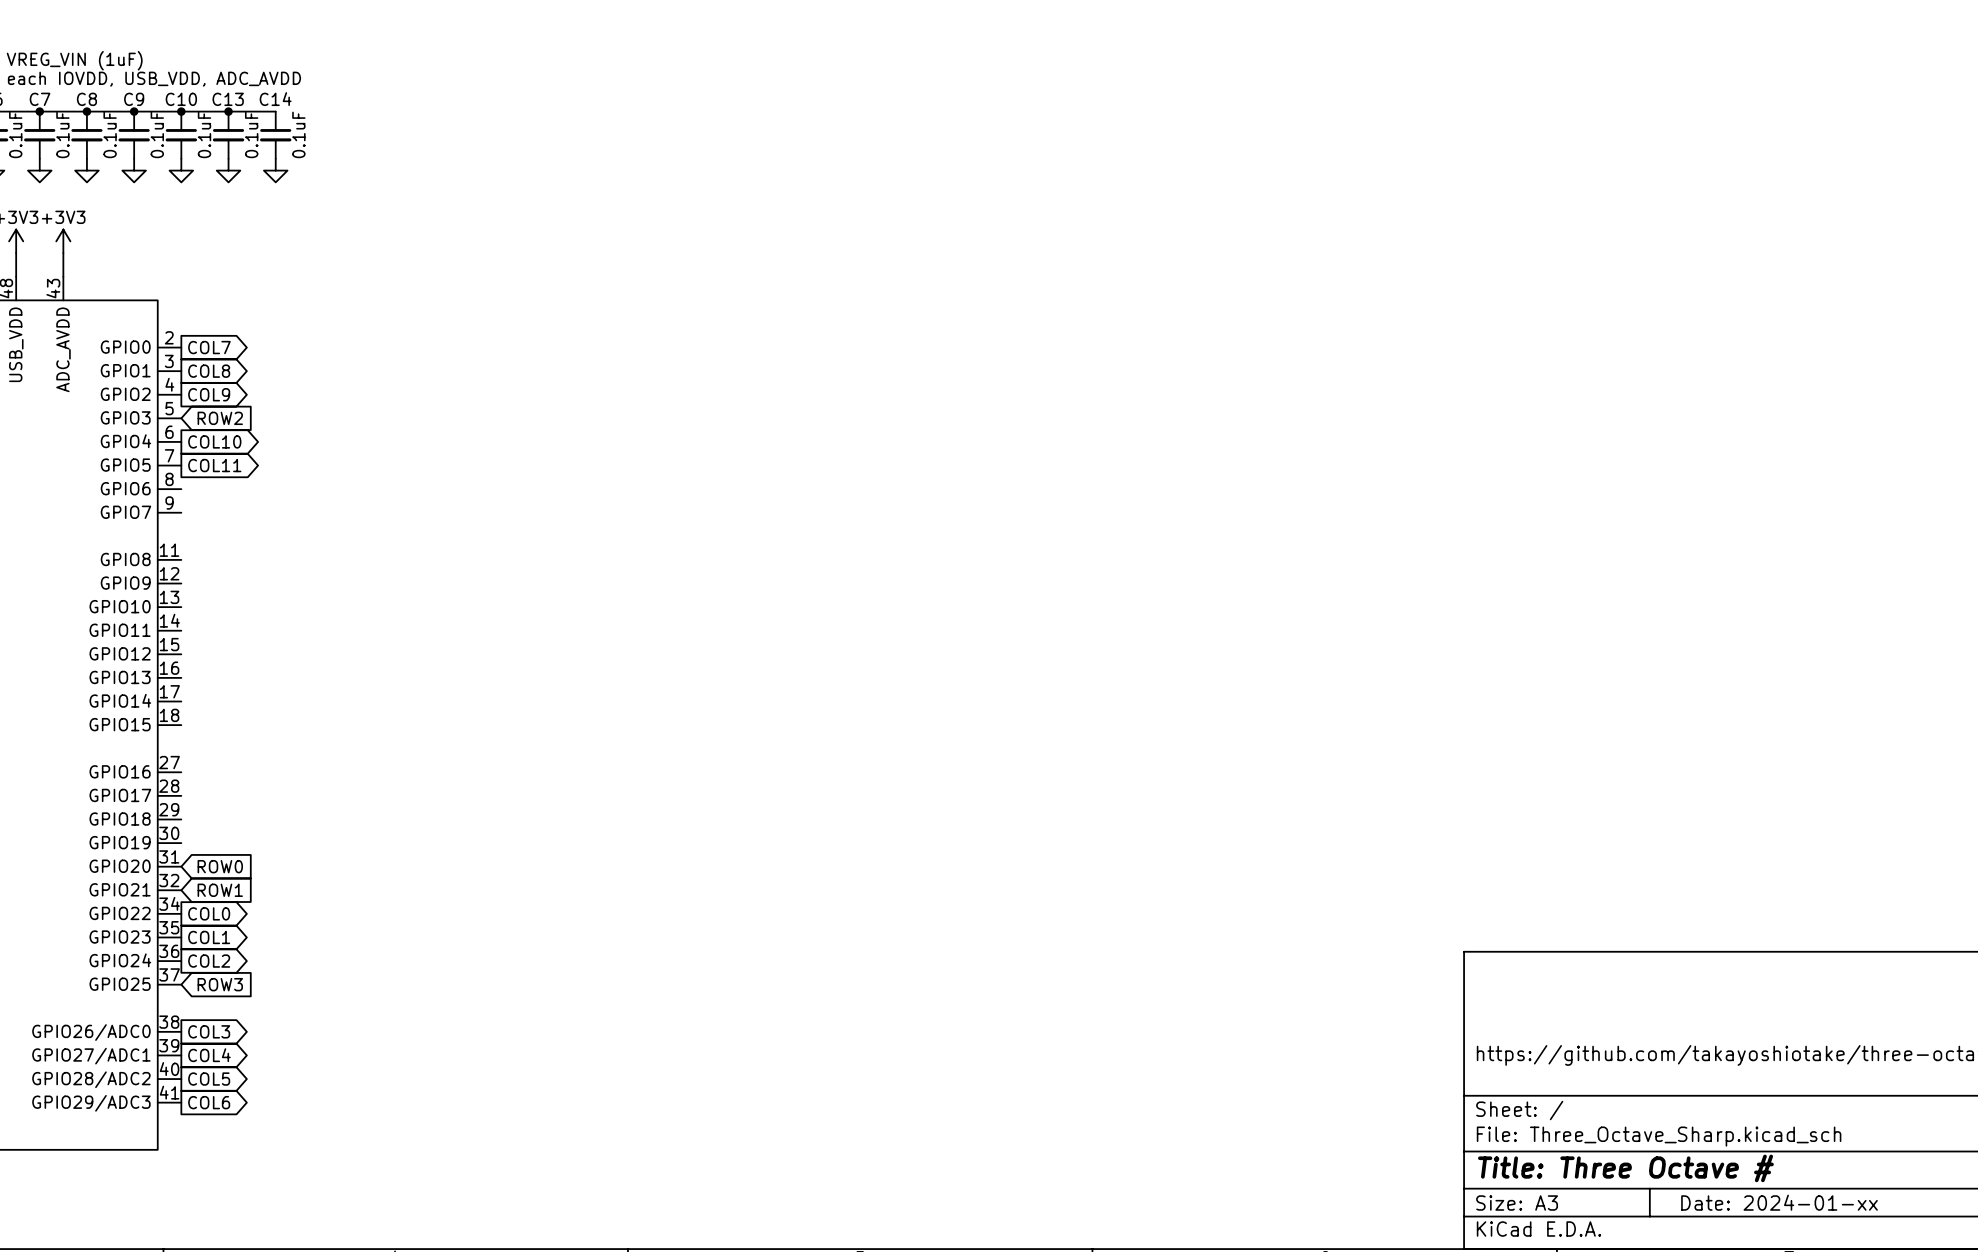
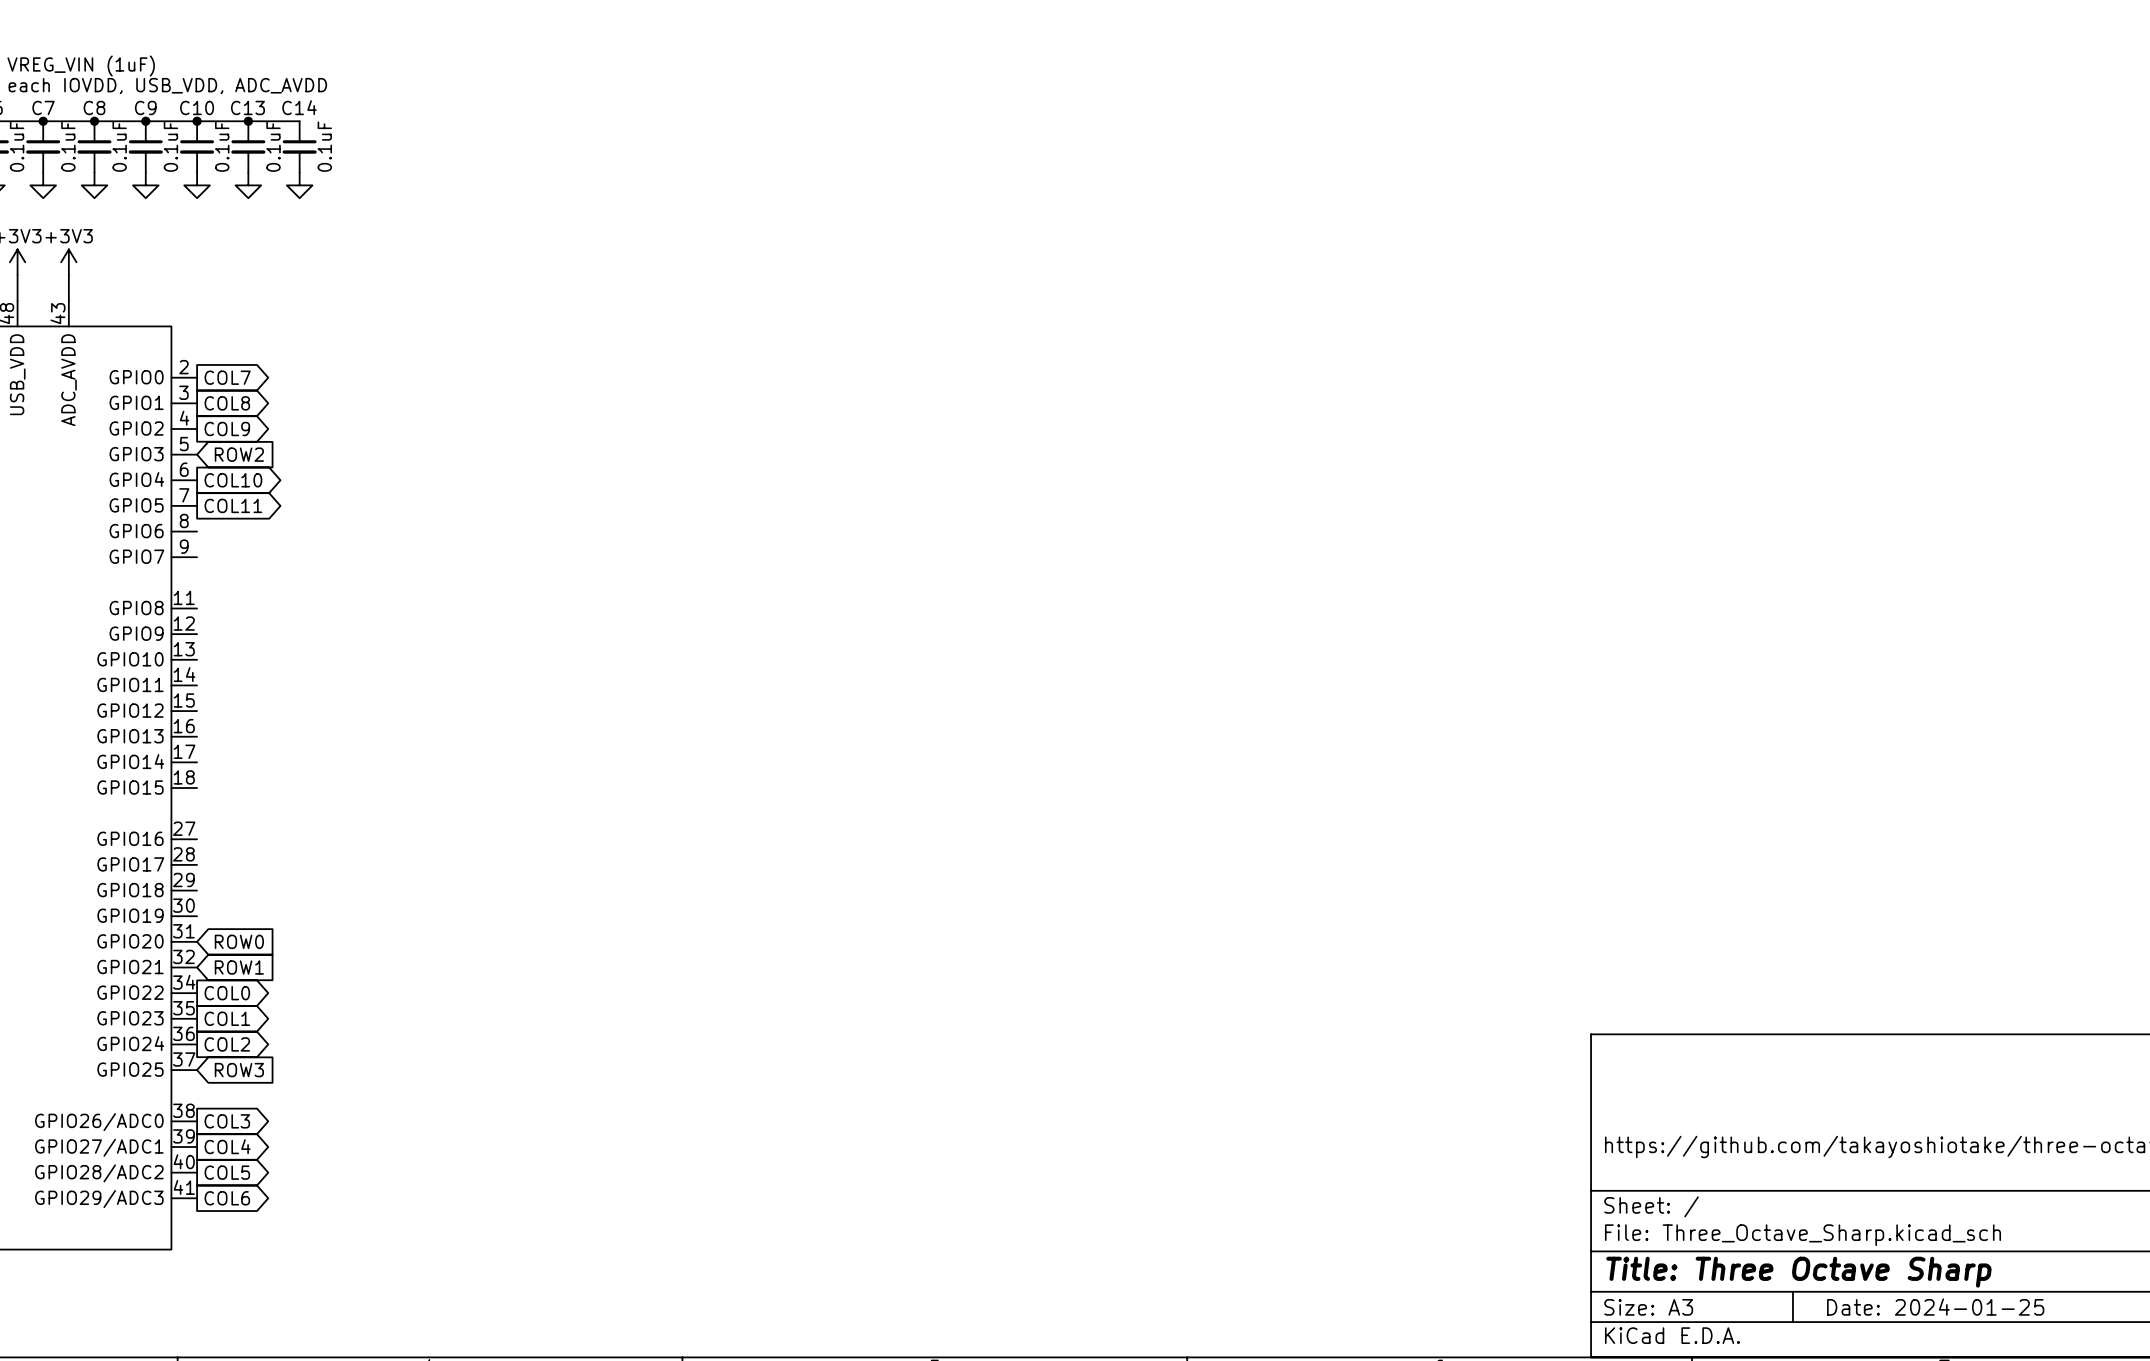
title block: Title: Three Octave # (1625, 1168) -> Title: Three Octave Sharp (1798, 1272)
title block: Date: 2024-01-xx (1779, 1202) -> Date: 2024-01-25 (1935, 1307)

